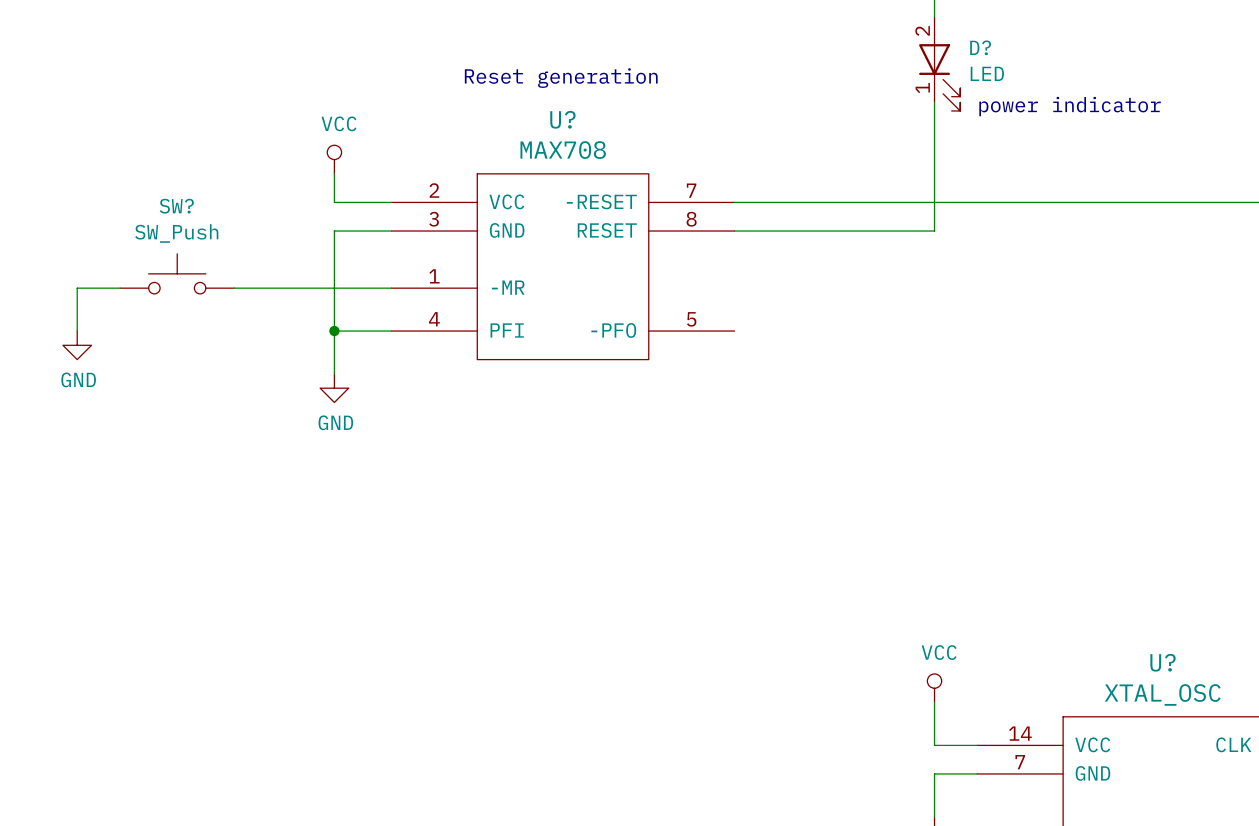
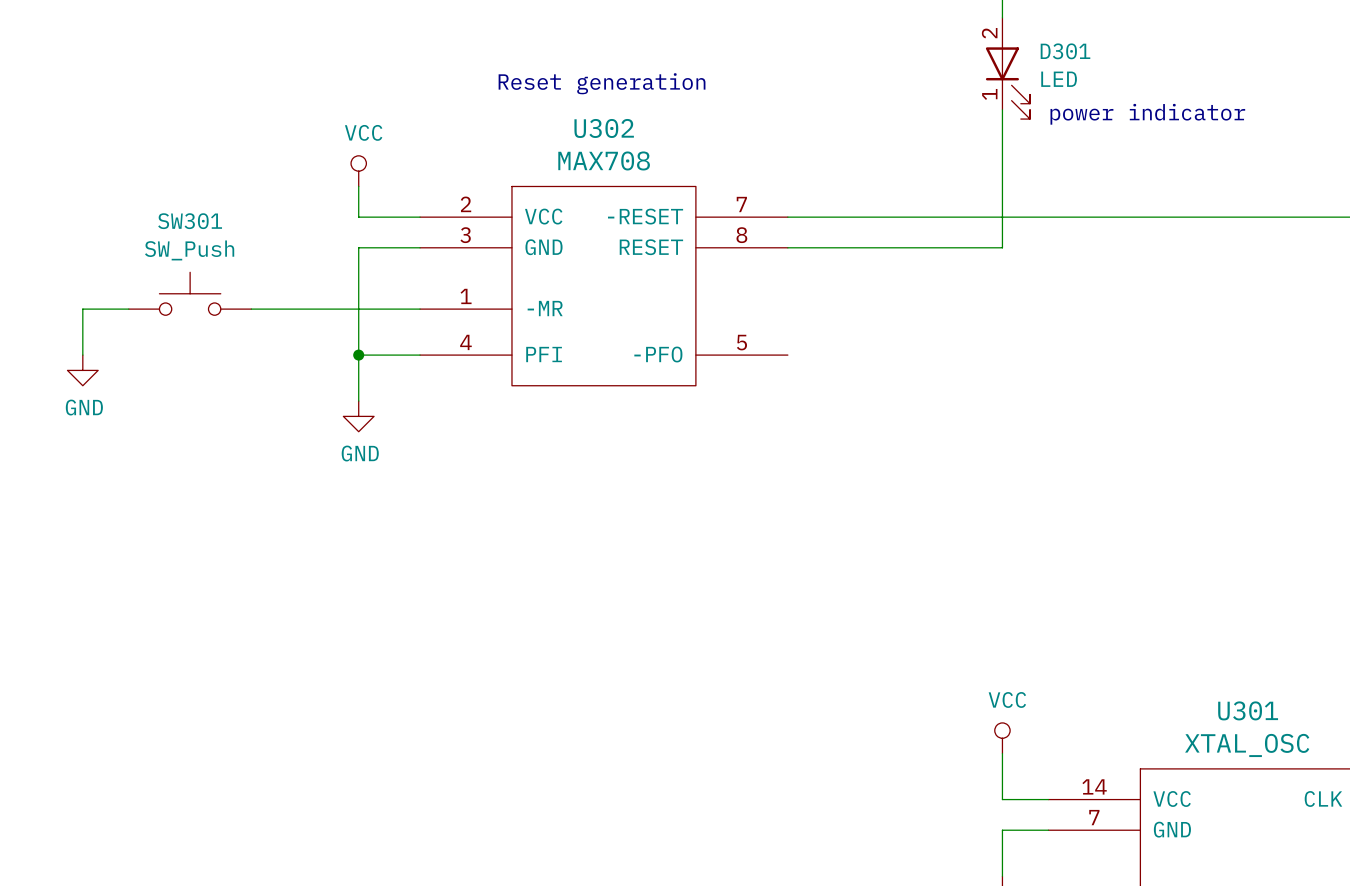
D? name: D? (980, 47) -> D301 (1065, 51)
U? name: U? (562, 119) -> U302 (604, 128)
SW? name: SW? (176, 206) -> SW301 (190, 221)
U? name: U? (1163, 662) -> U301 (1248, 710)

